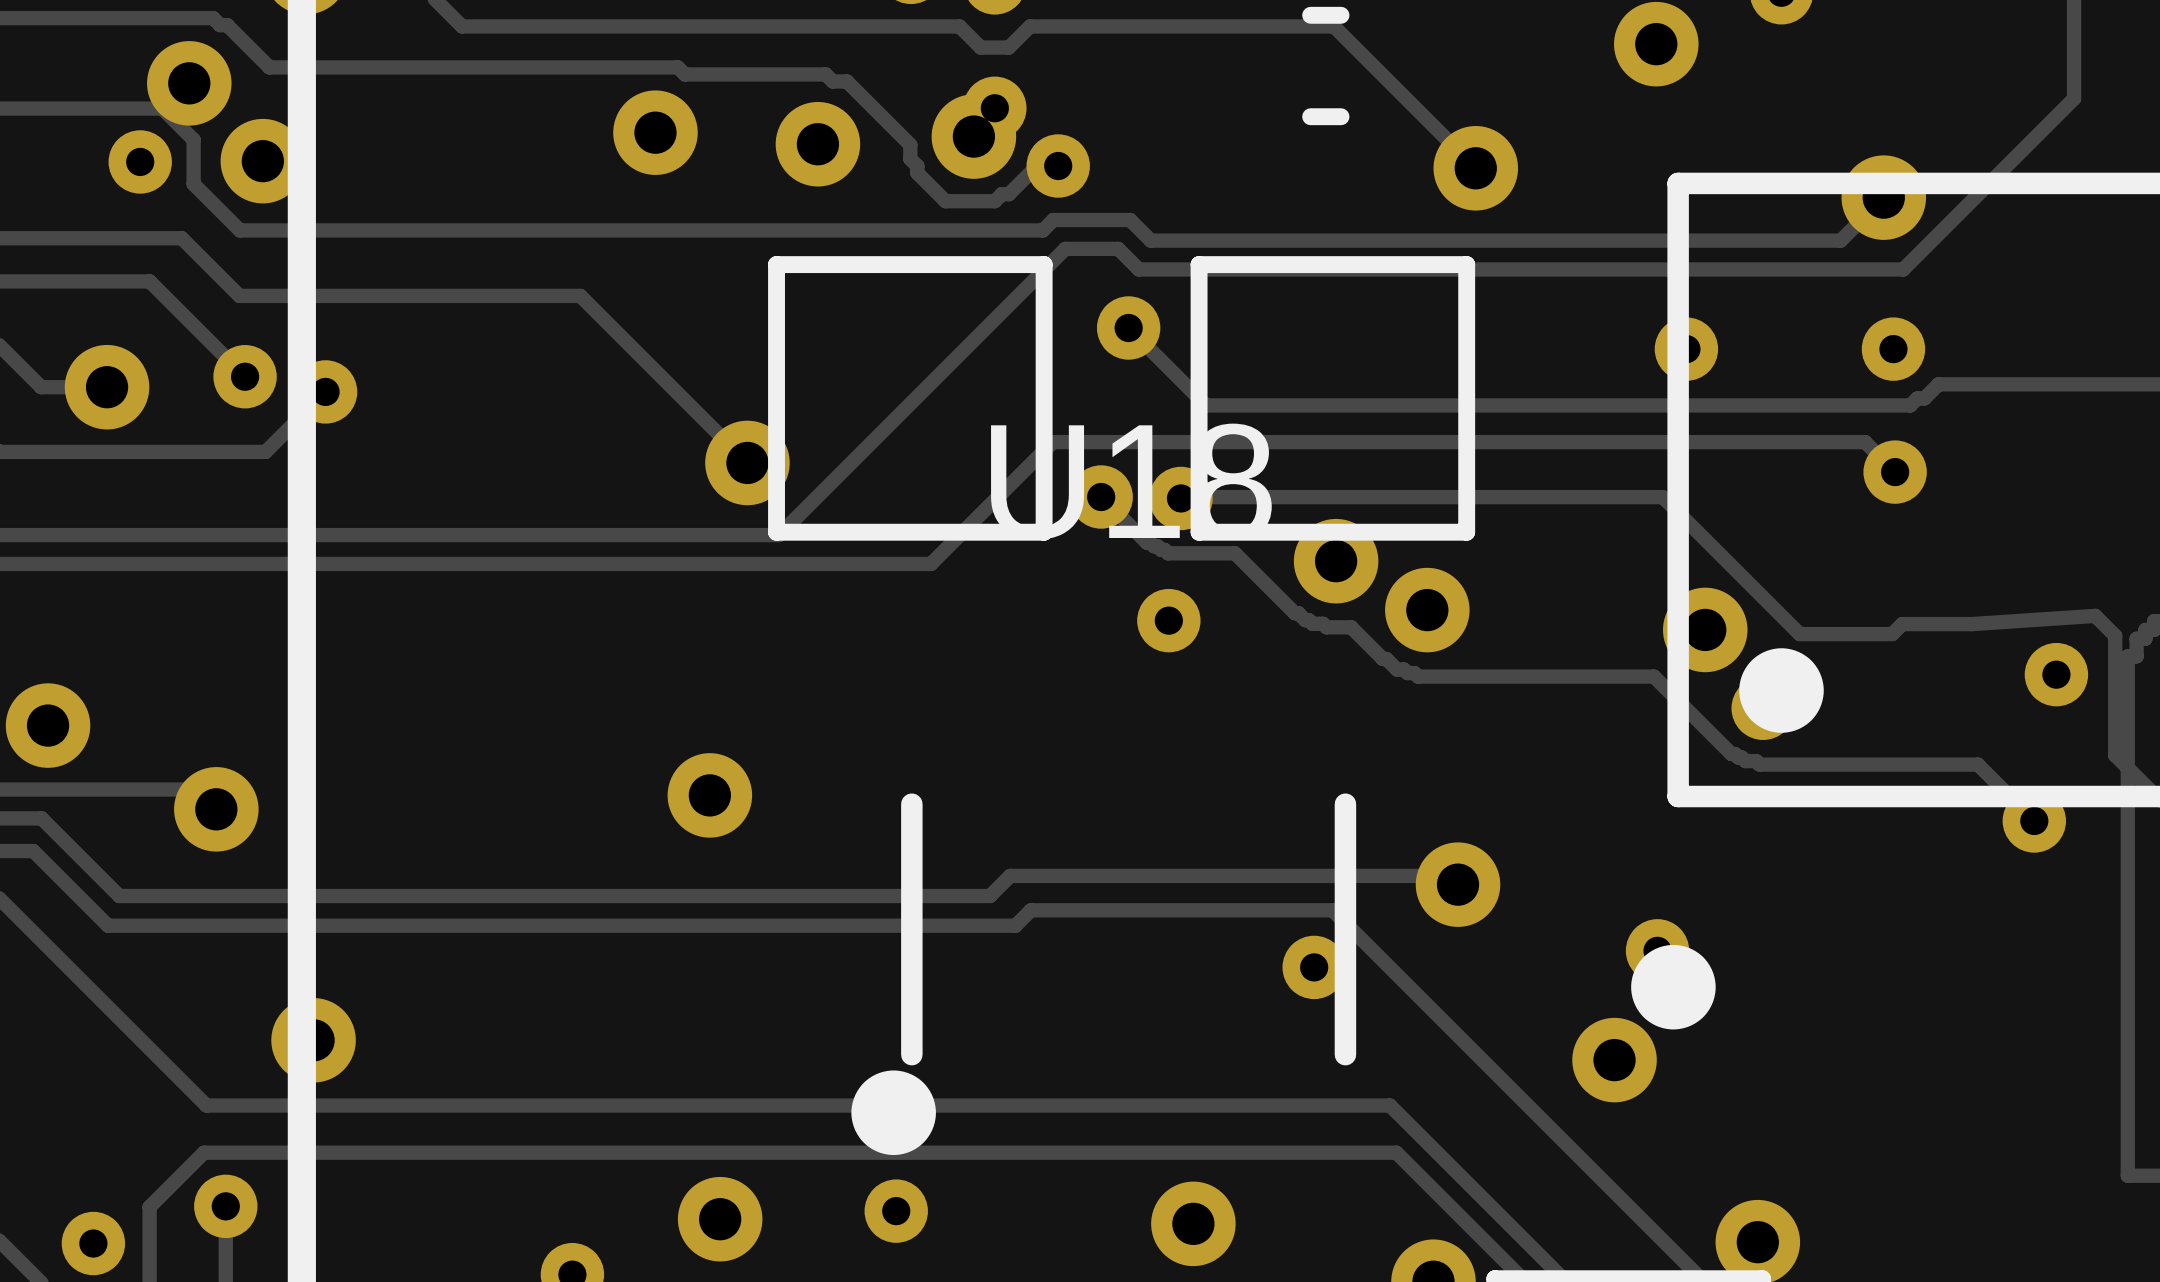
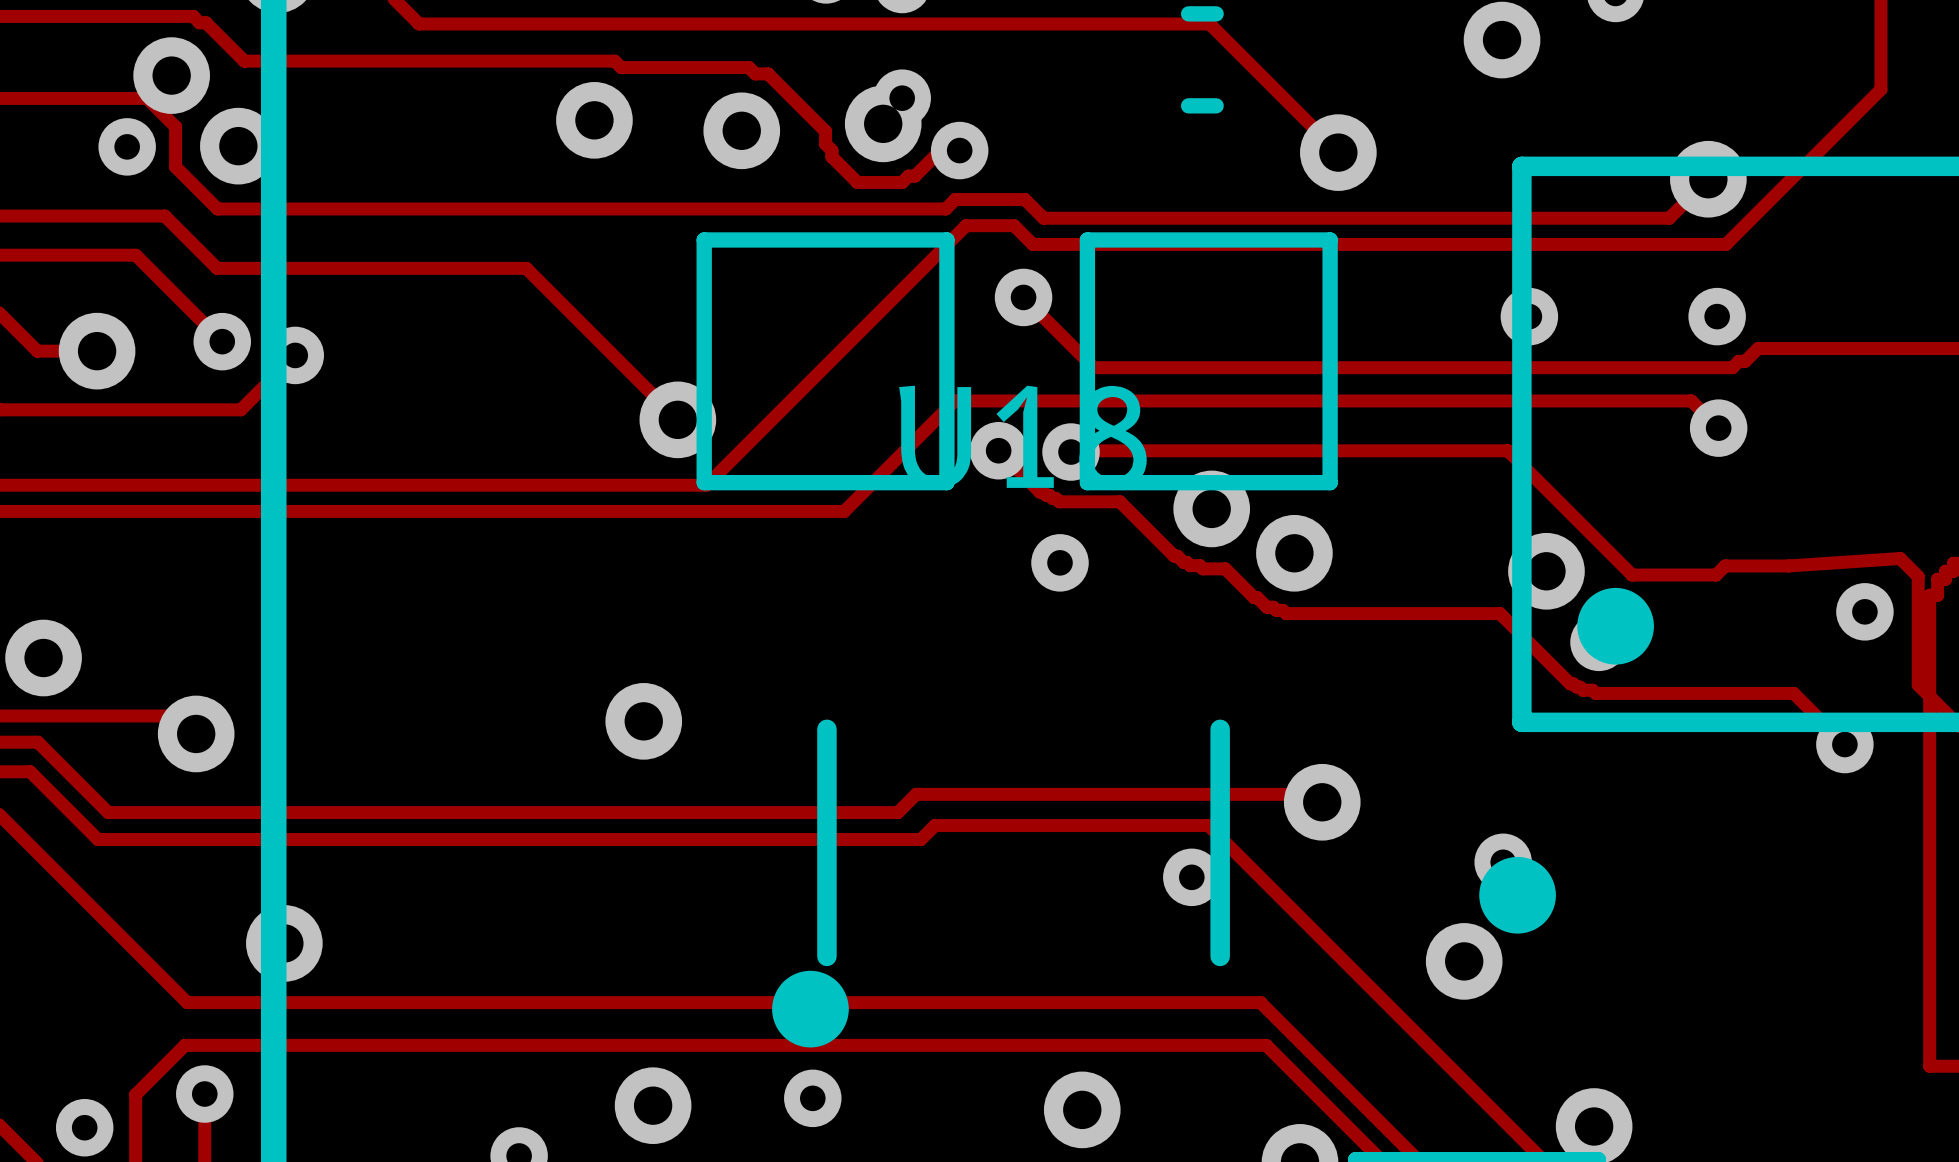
track: (959, 26) (980, 47) (1008, 47) (1030, 26) -> (870, 23) (934, 23)

